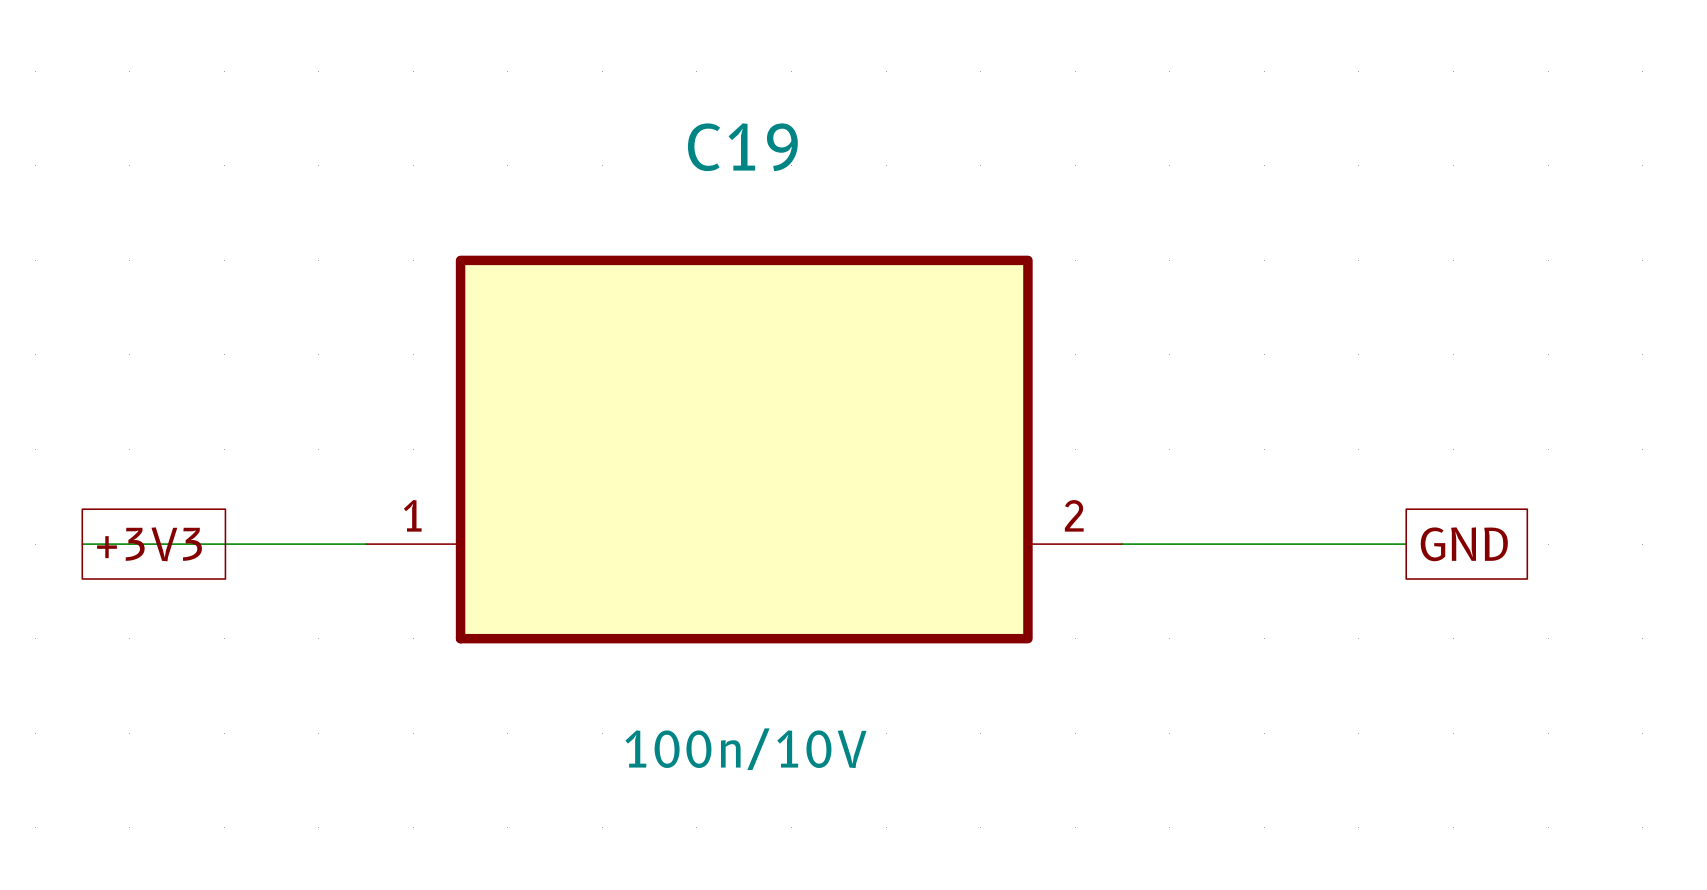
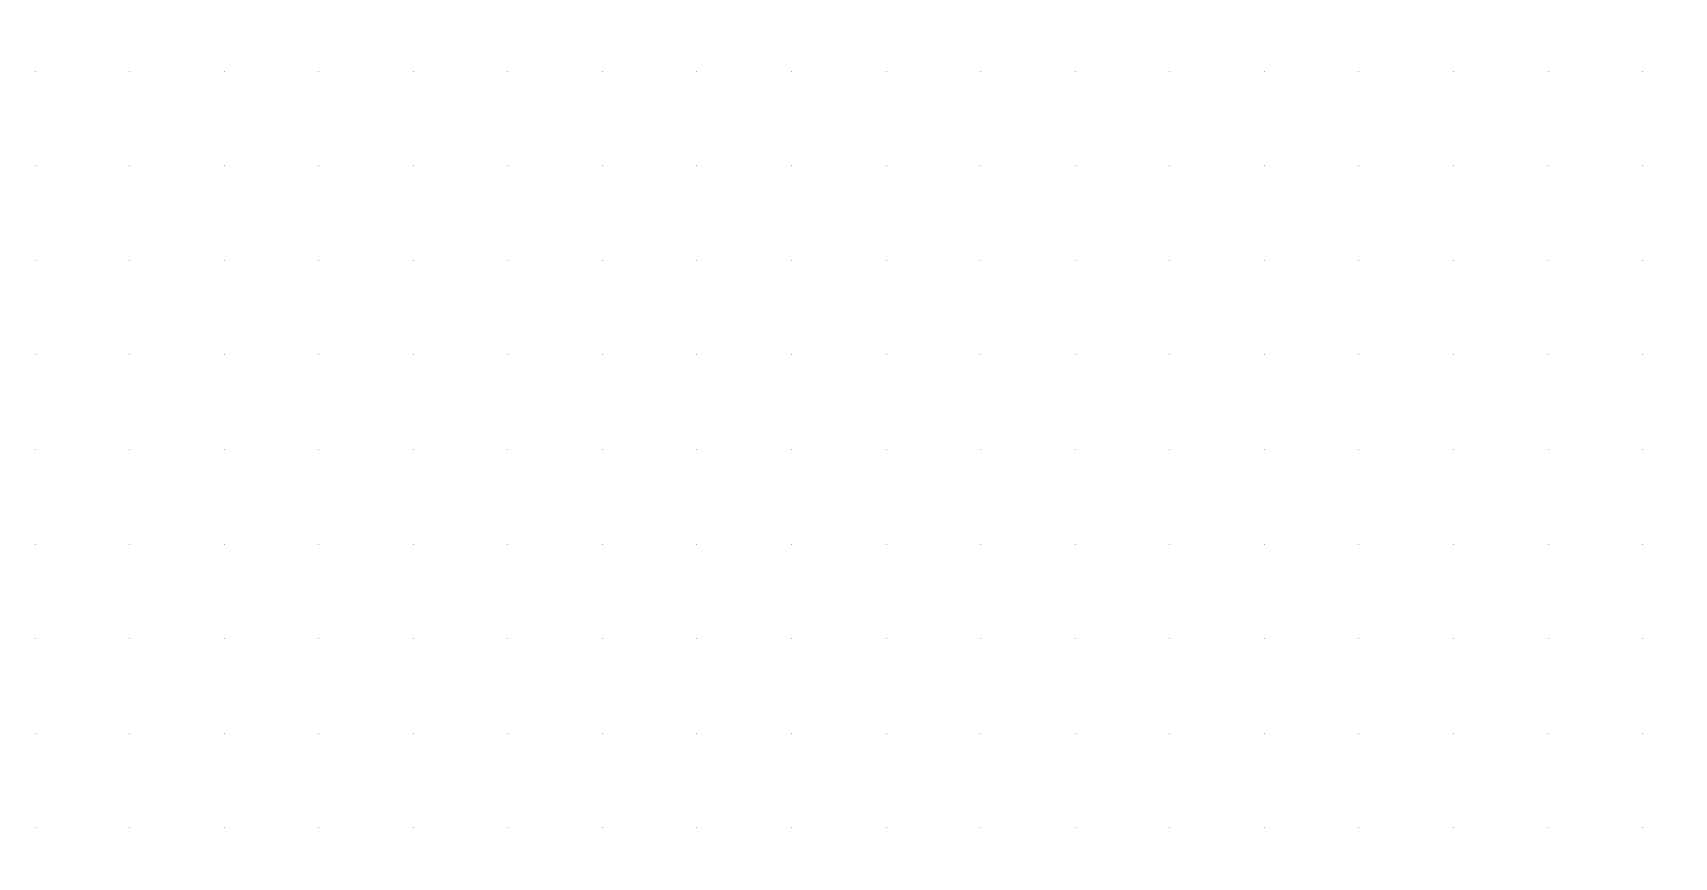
C19: 100n/10V (744, 449) -> none
wire: (82, 544) (365, 544) -> none
global label: +3V3 (149, 544) -> none
wire: (1122, 544) (1406, 544) -> none
global label: GND (1464, 544) -> none

